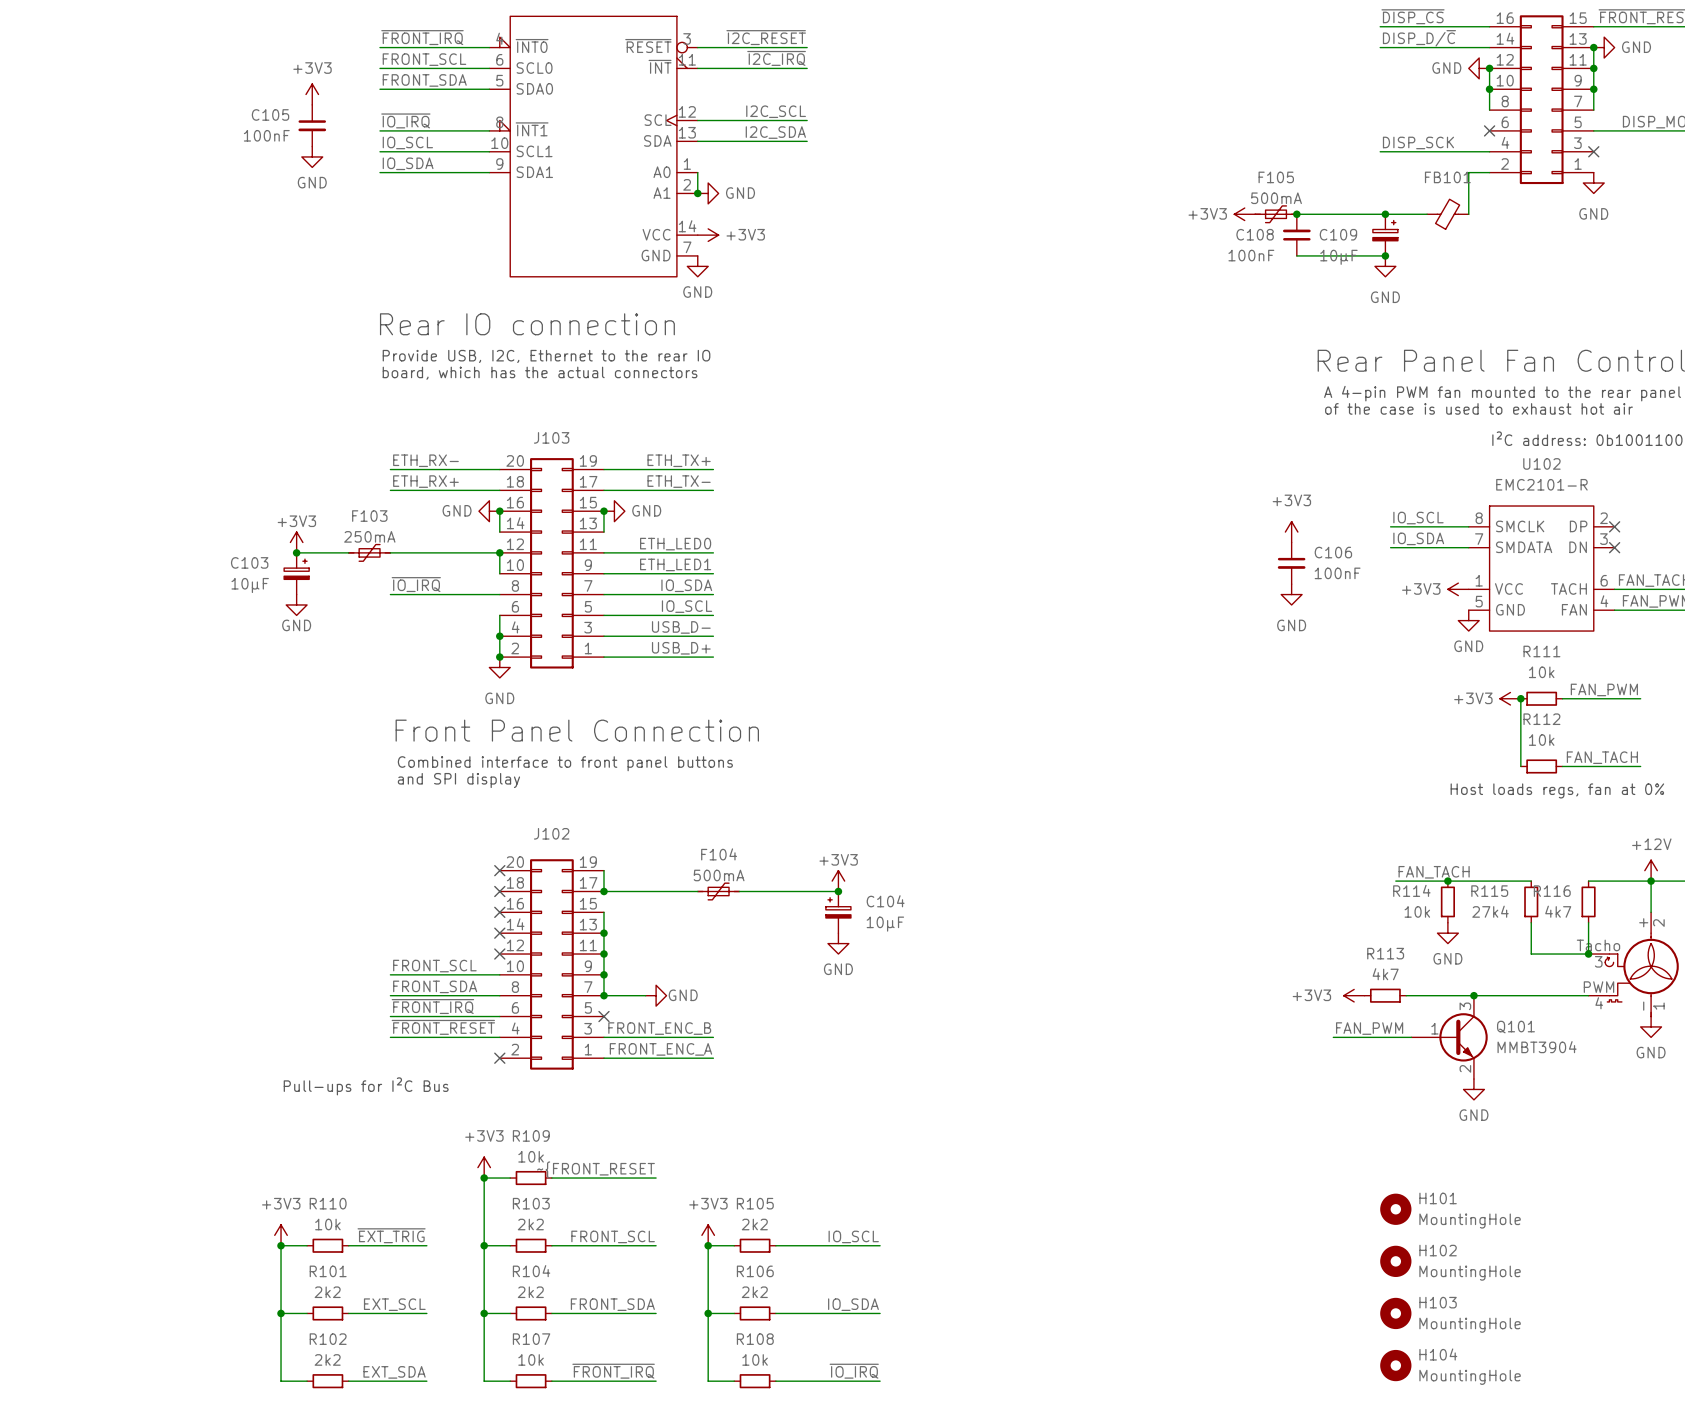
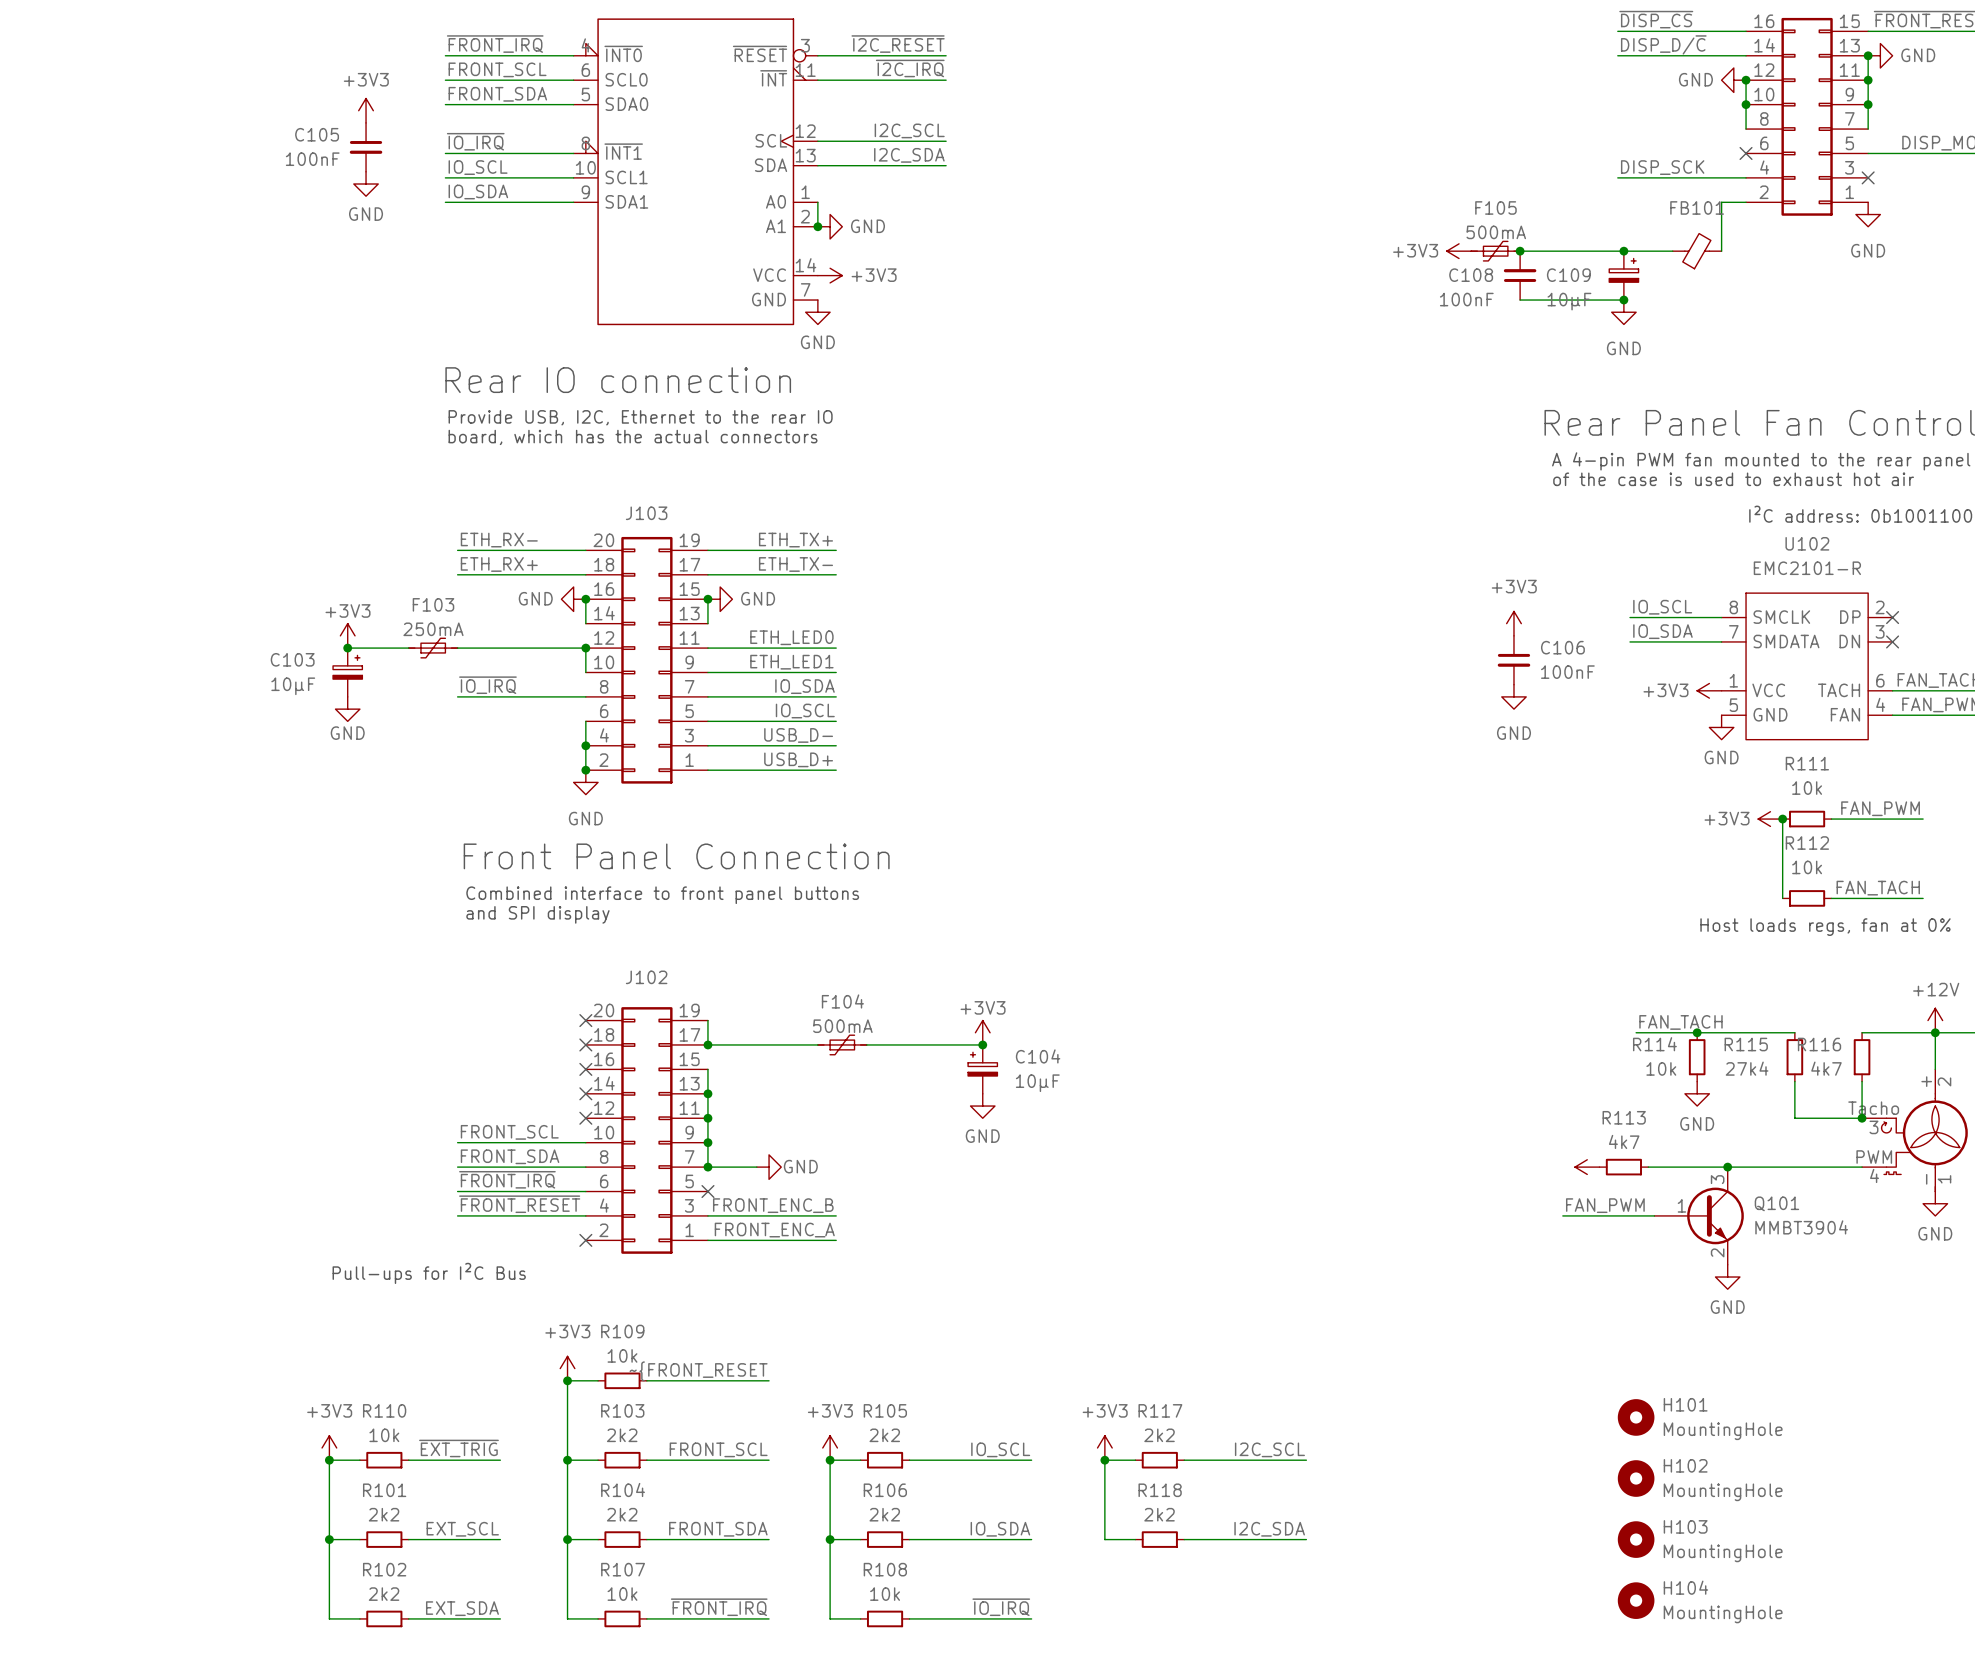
power symbol text: +3V3 (1311, 995) -> none
power symbol: none -> +3V3 (1104, 1447)
label: none -> I2C_SCL (1269, 1449)
junction: none -> (1104, 1460)
wire: none -> (1135, 1460) (1104, 1460) (1104, 1539) (1135, 1539)
R117: none -> 2k2 (1159, 1460)
wire: none -> (1184, 1460) (1306, 1460)
label: none -> I2C_SDA (1269, 1529)
R118: none -> 2k2 (1159, 1539)
wire: none -> (1184, 1539) (1306, 1539)

